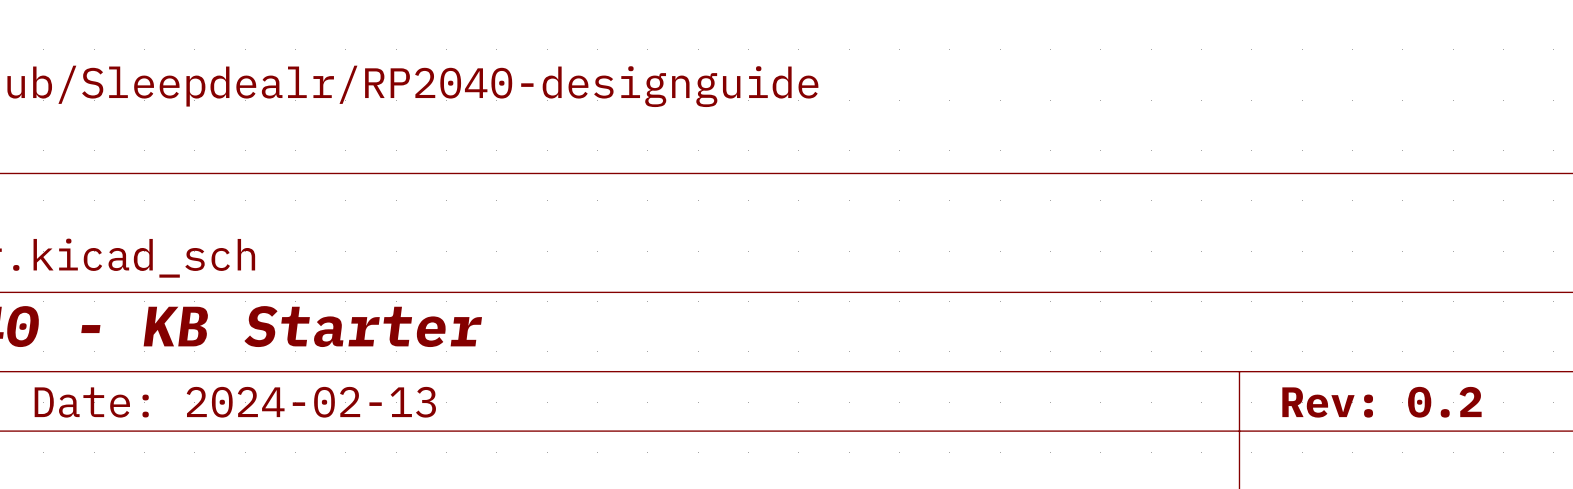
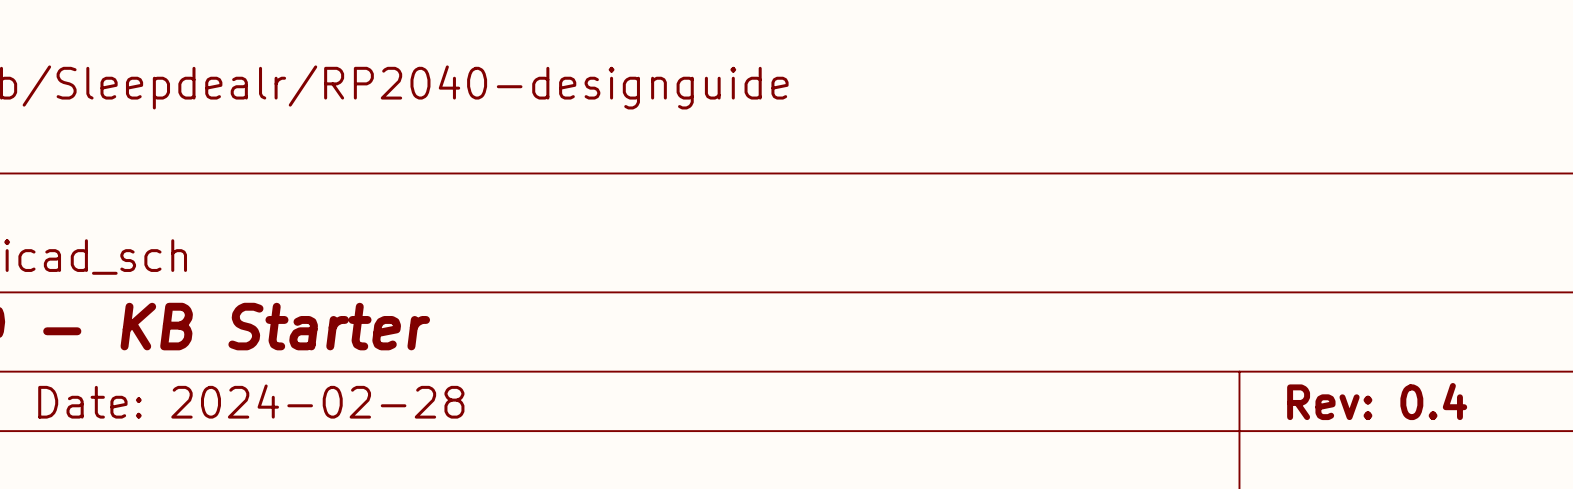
title block: Date: 2024-02-13 (235, 402) -> Date: 2024-02-28 (251, 401)
title block: Rev: 0.2 (1381, 402) -> Rev: 0.4 (1377, 401)

